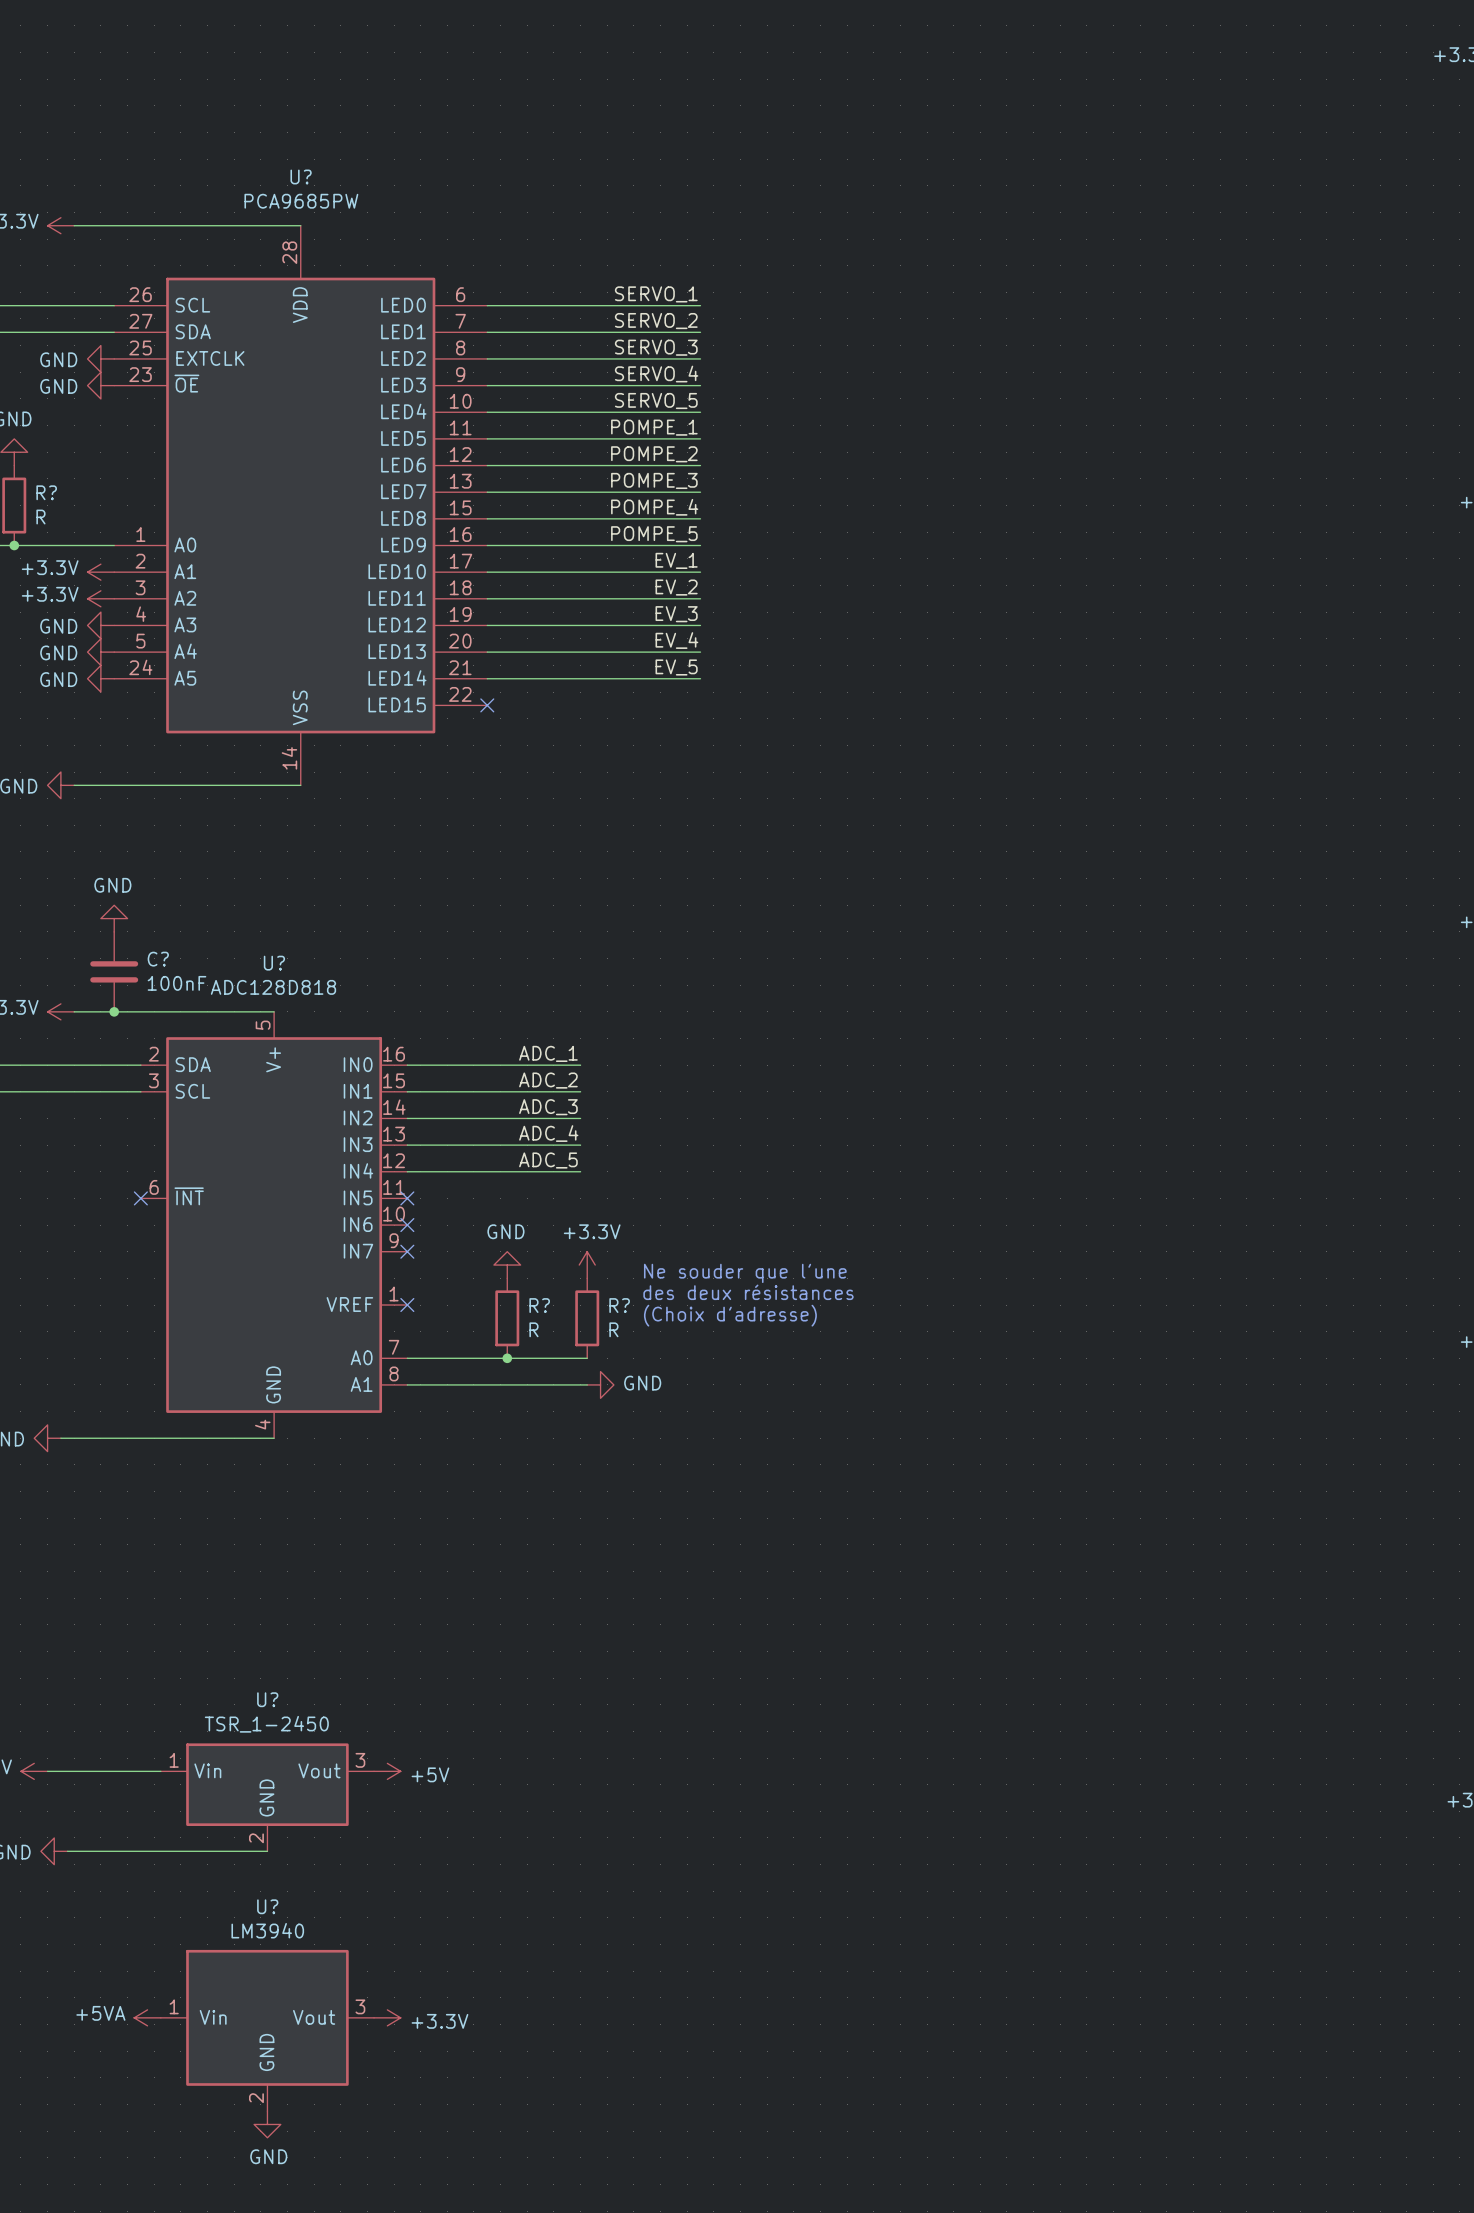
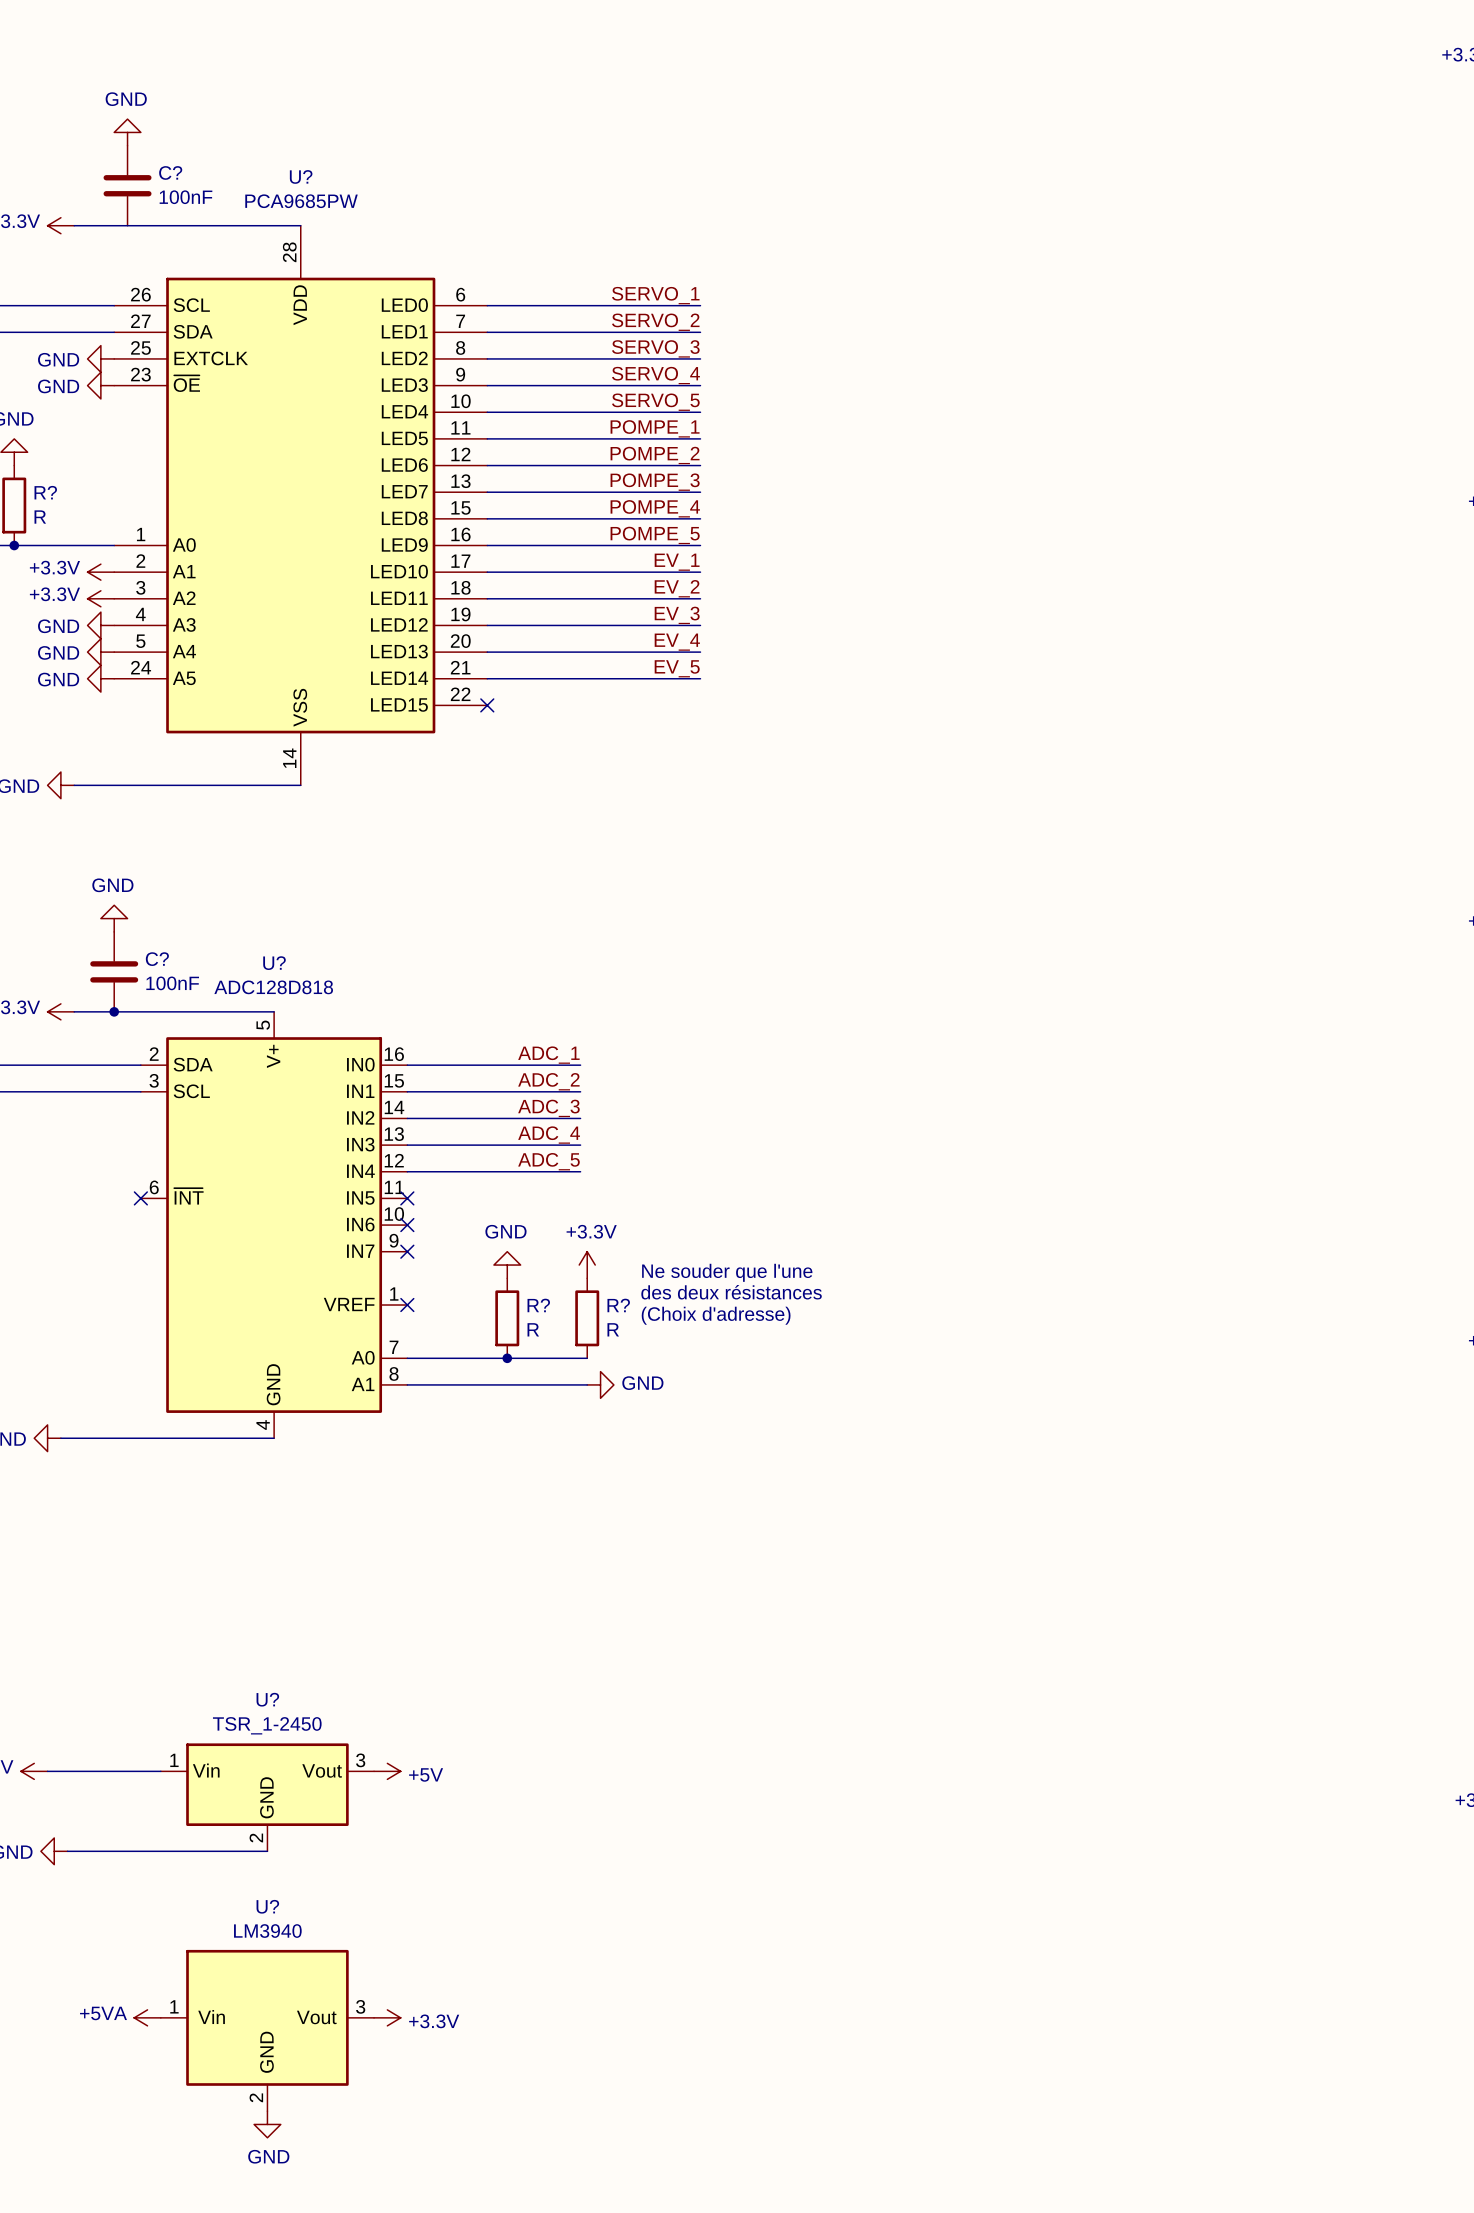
power symbol: none -> GND (127, 132)
C?: none -> 100nF (127, 185)

